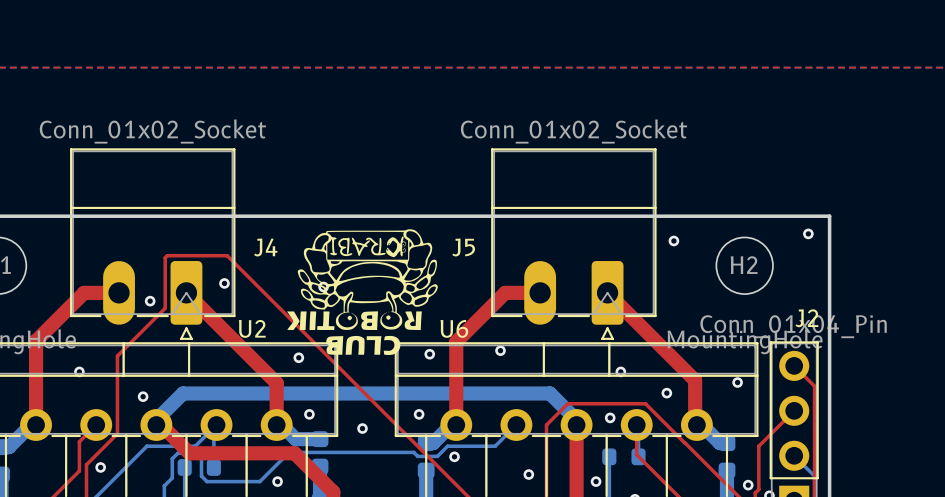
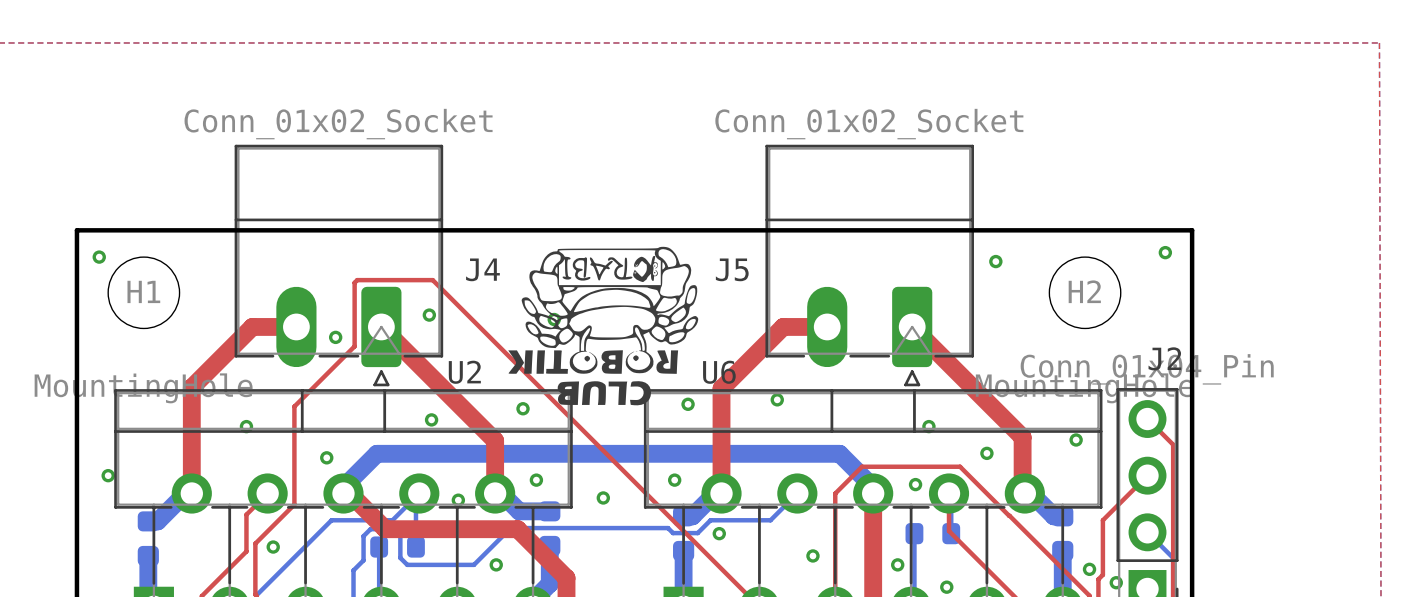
via: none -> (431, 419)
via: none -> (458, 500)

